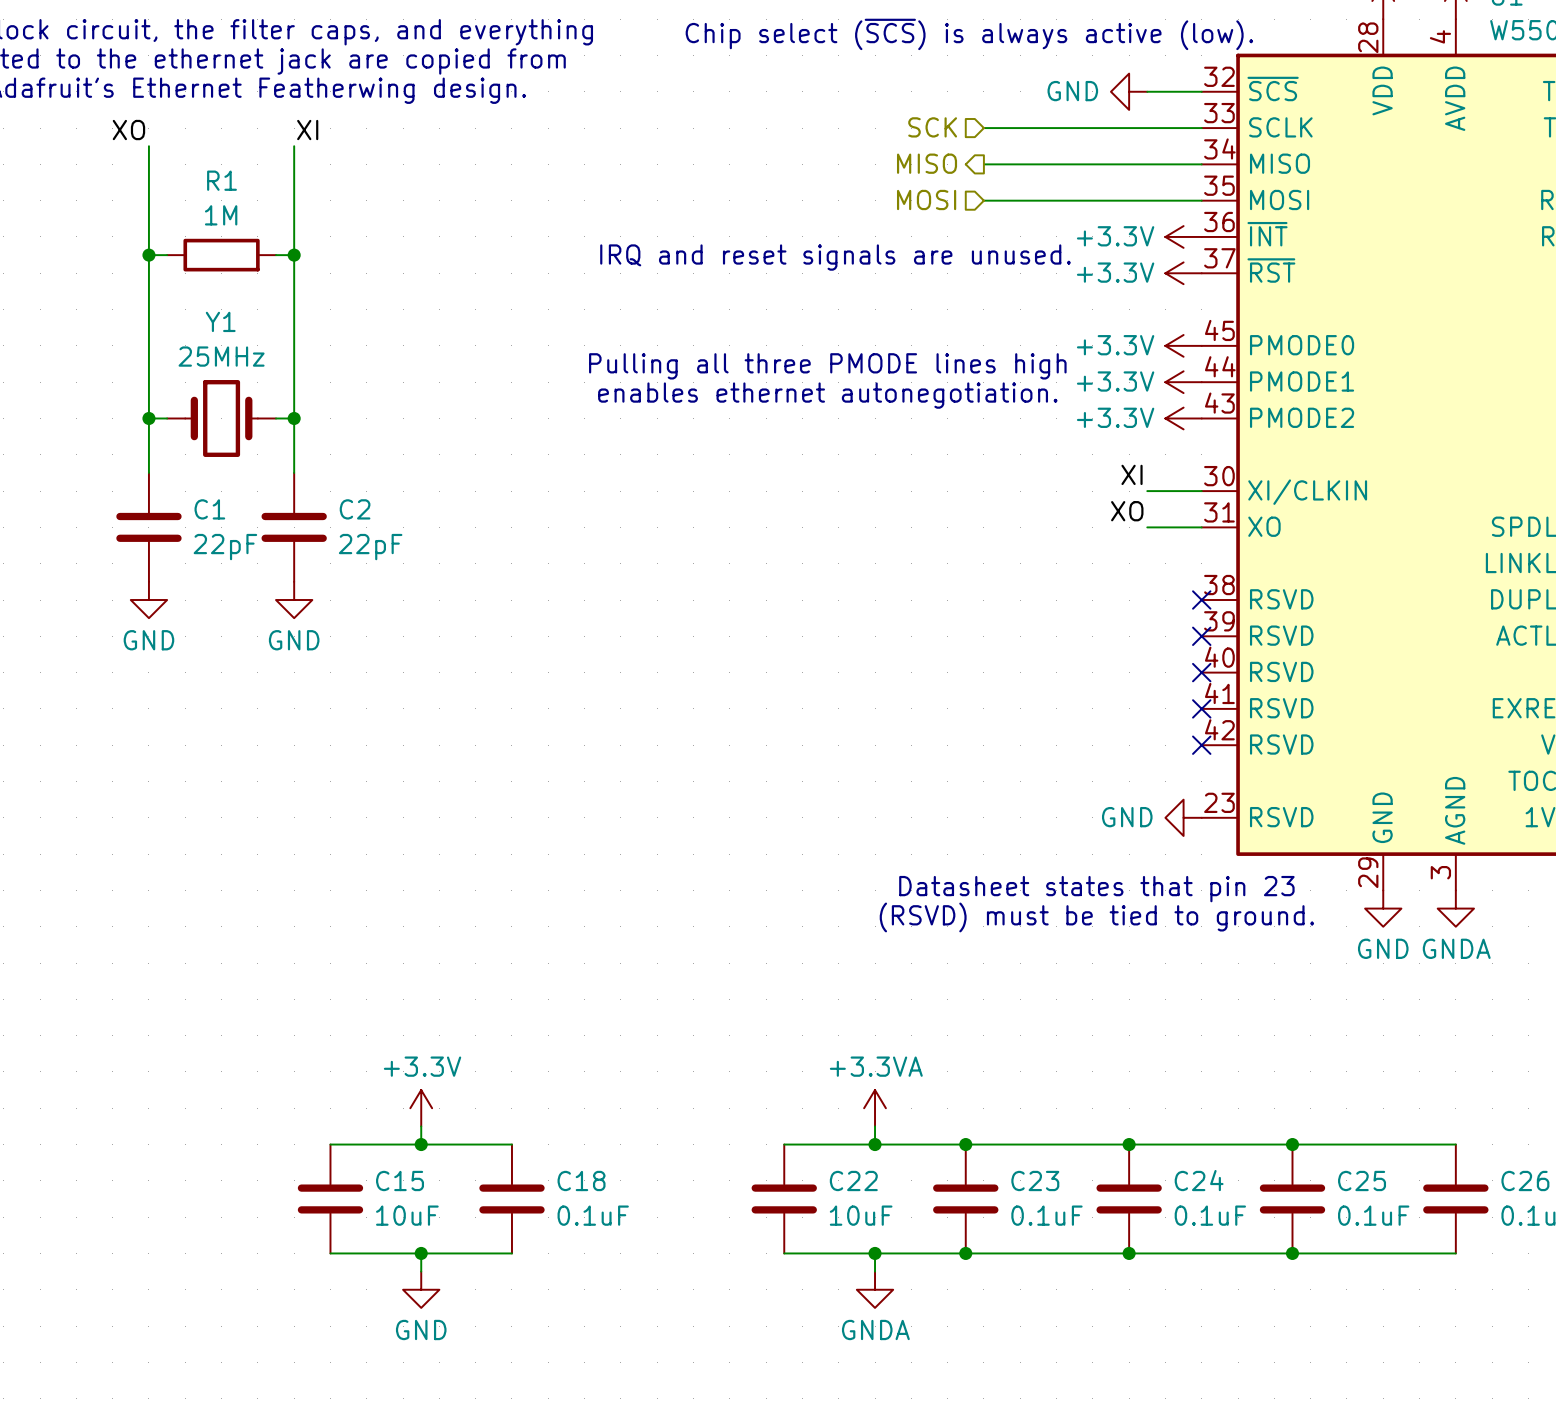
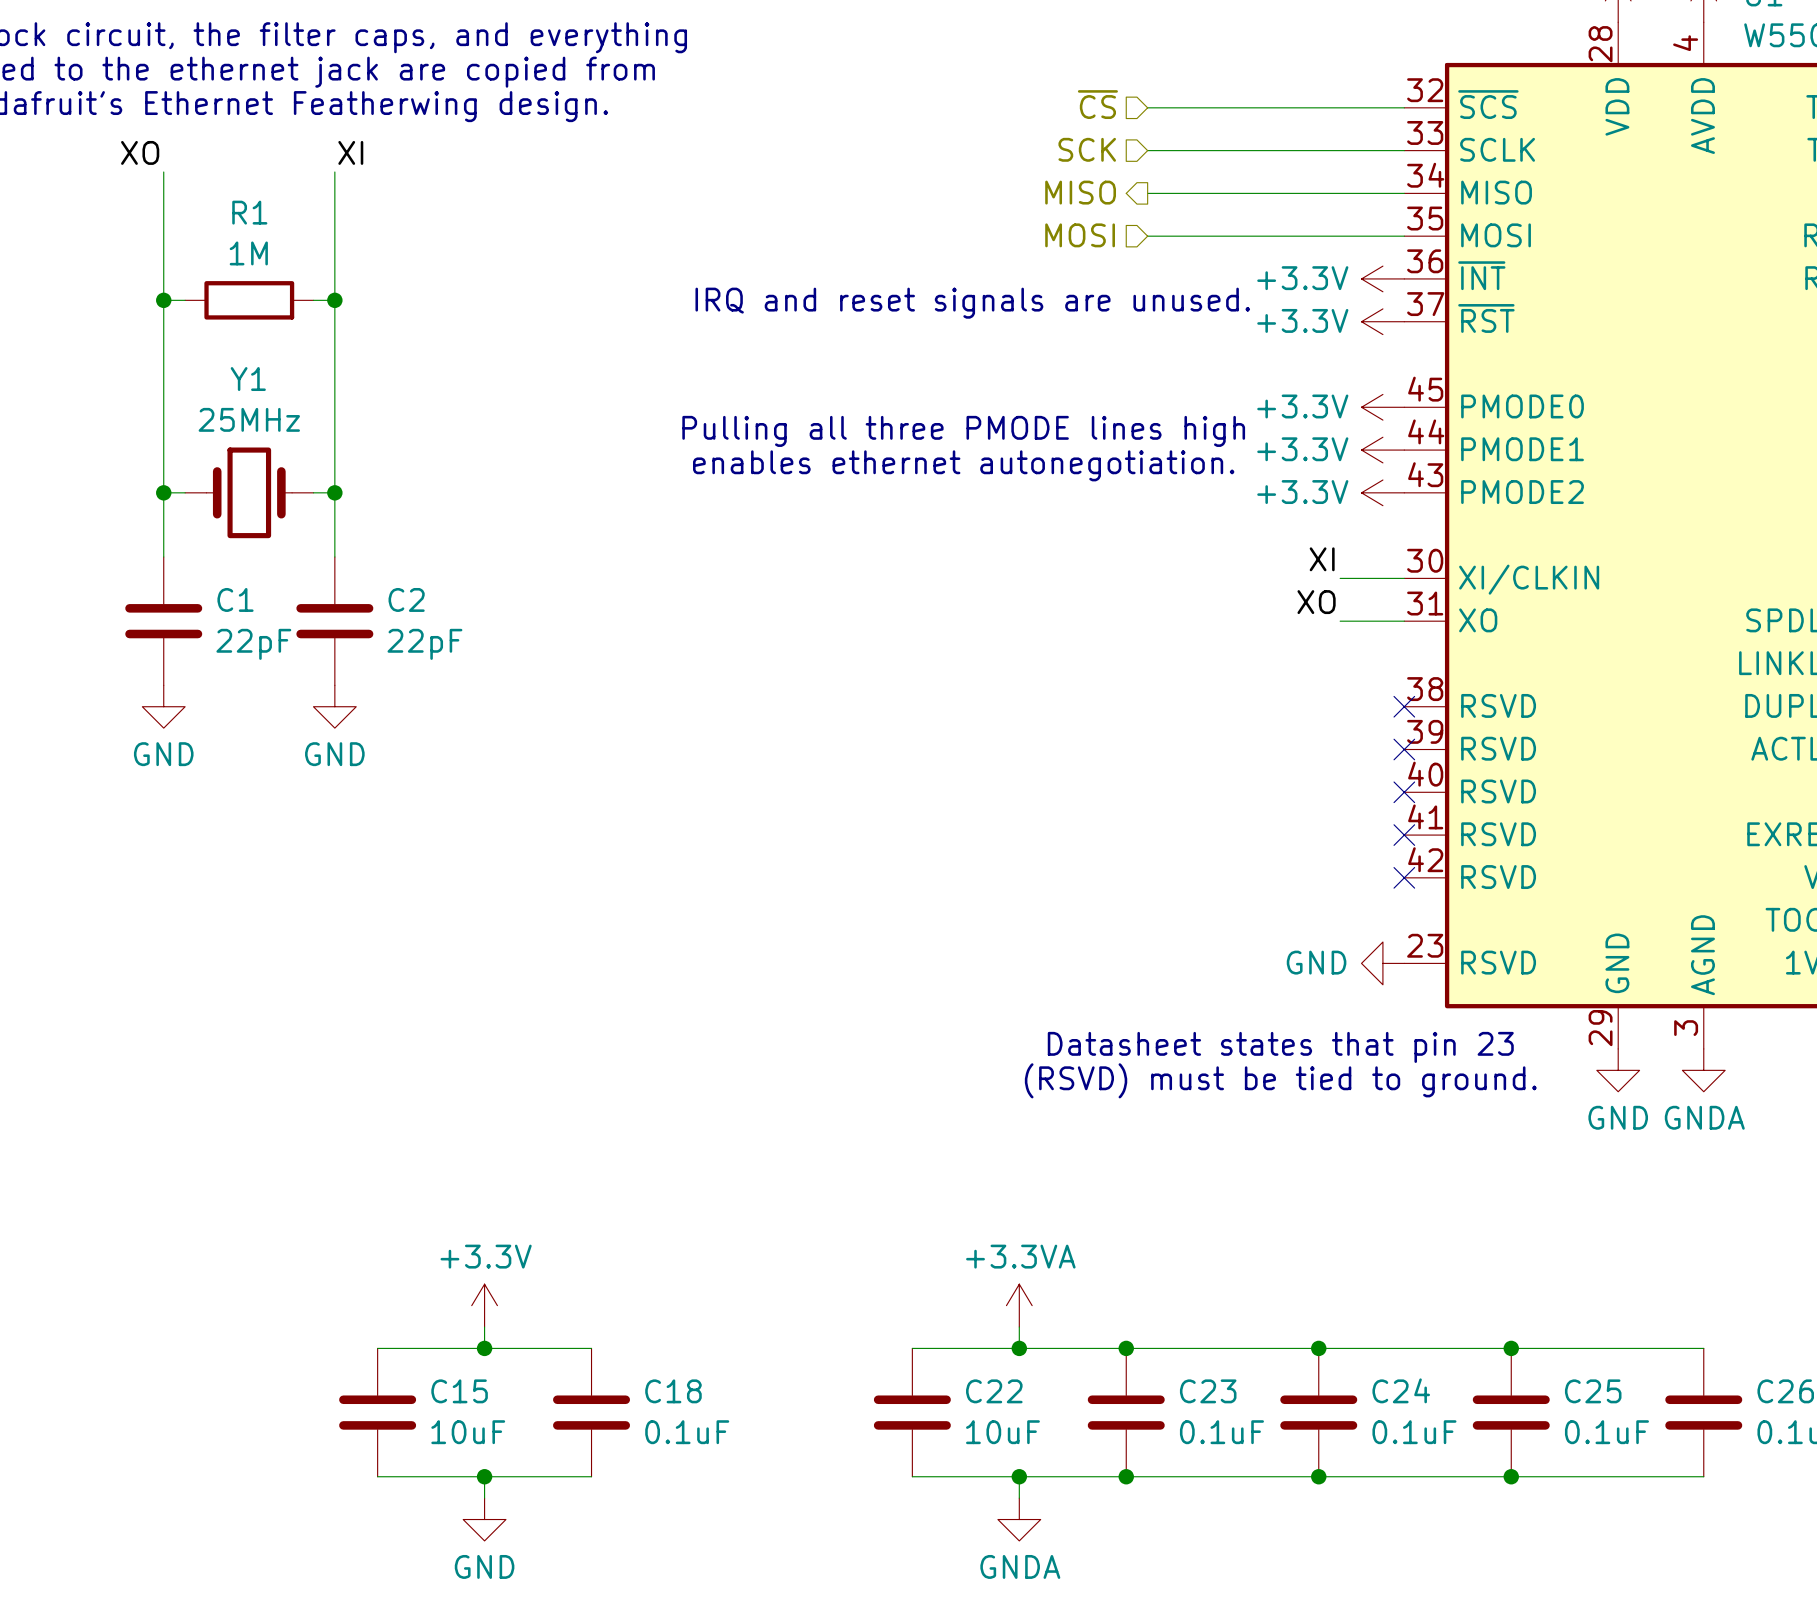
text: Chip select (~{SCS}) is always active (low). (969, 34) -> none
hierarchical label: none -> ~{CS} (1097, 104)
wire: none -> (1147, 107) (1340, 107)
power symbol: GND (1129, 91) -> none

